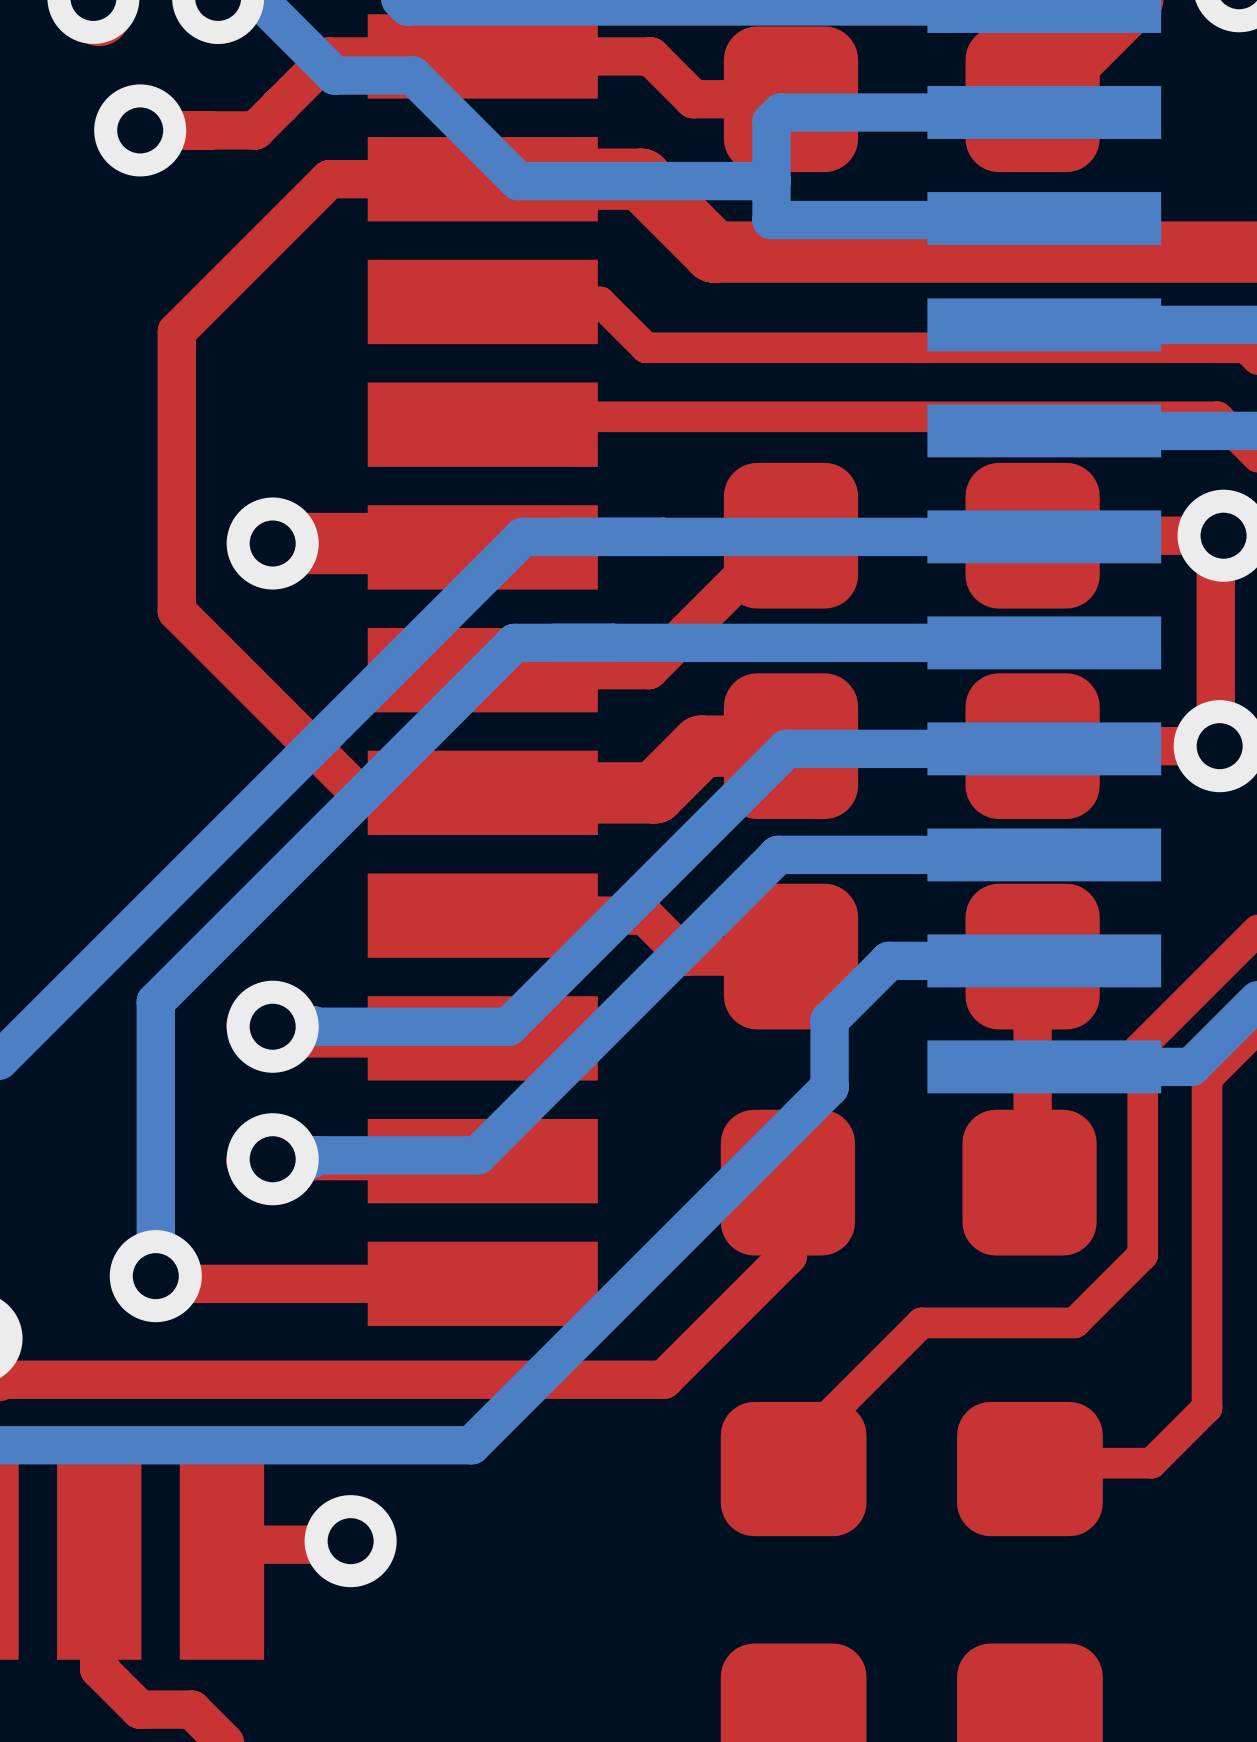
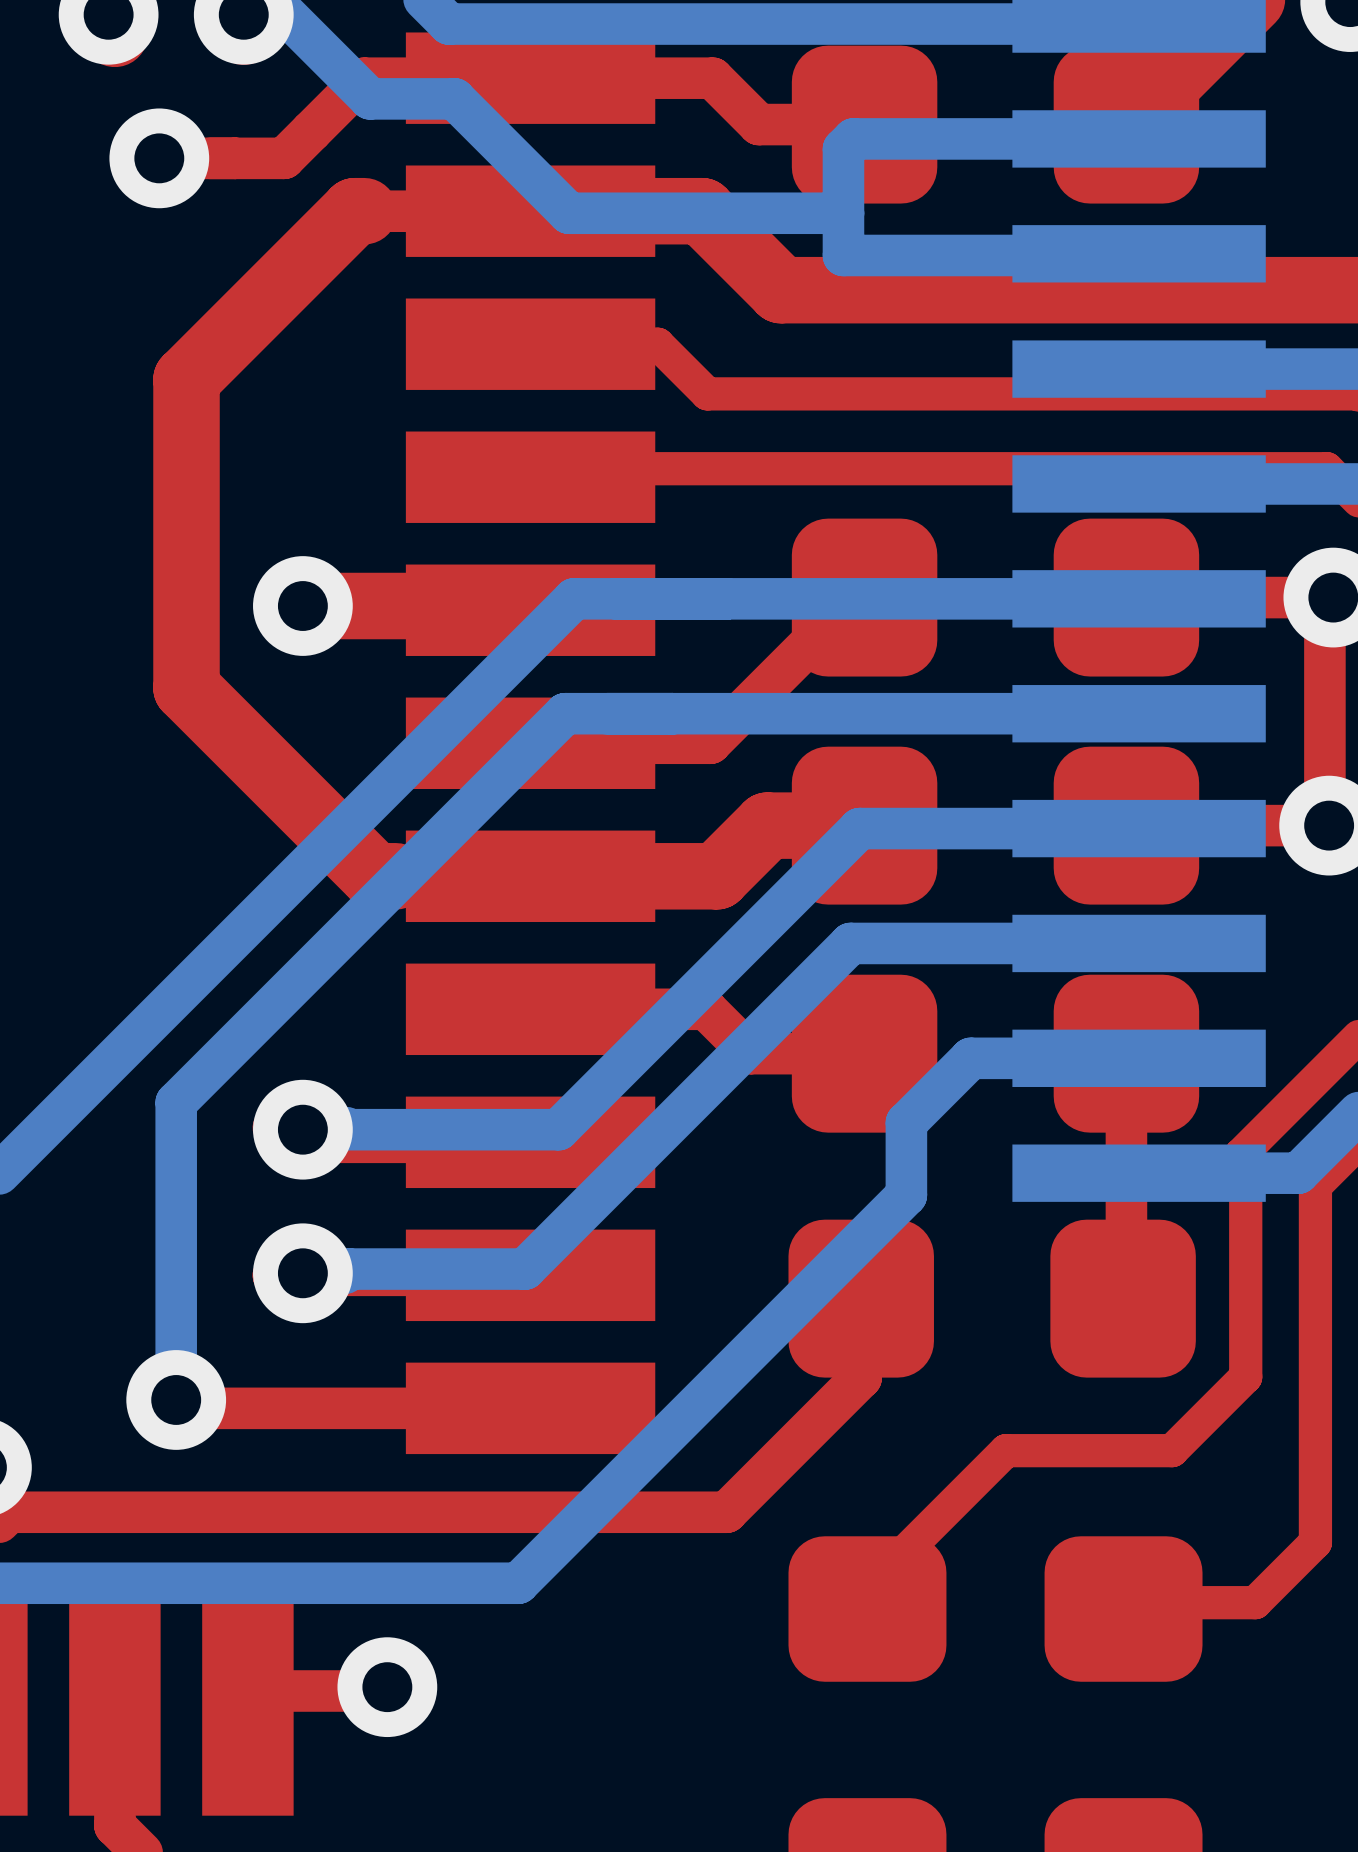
top track: (329, 179) (176, 331) (176, 611) (358, 792) -> (364, 211) (354, 211) (186, 379) (186, 688) (374, 876) (395, 876)

